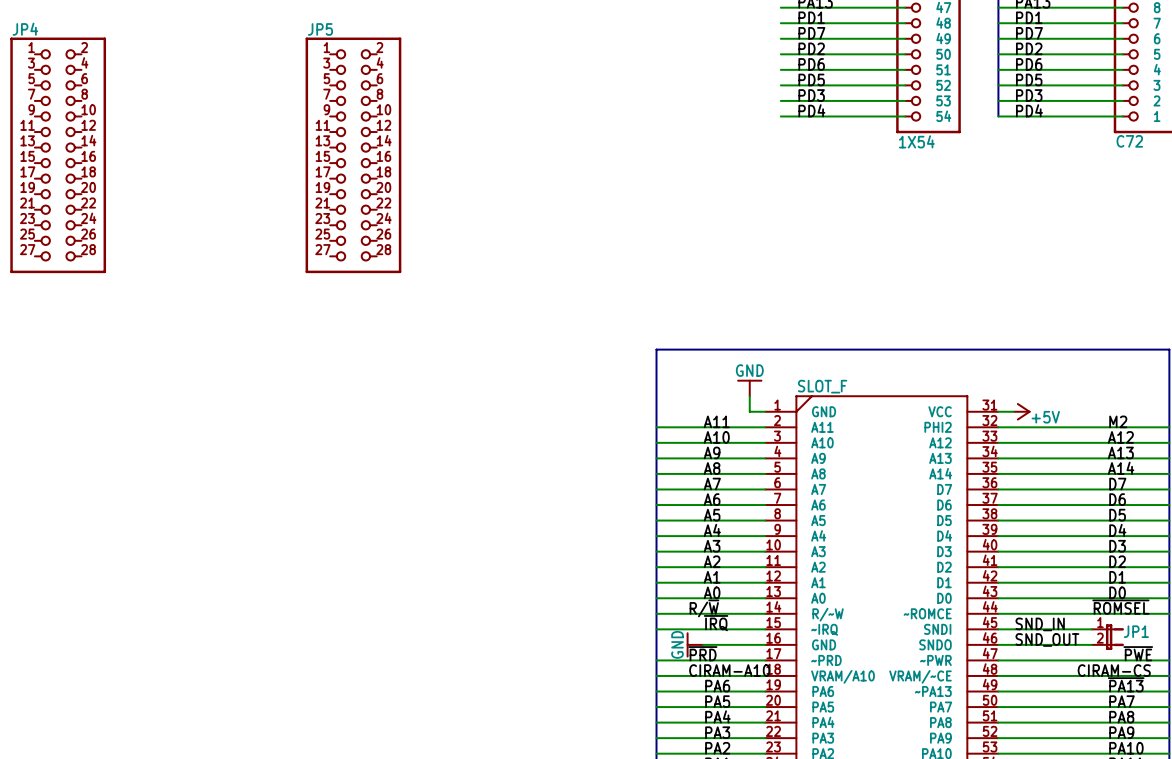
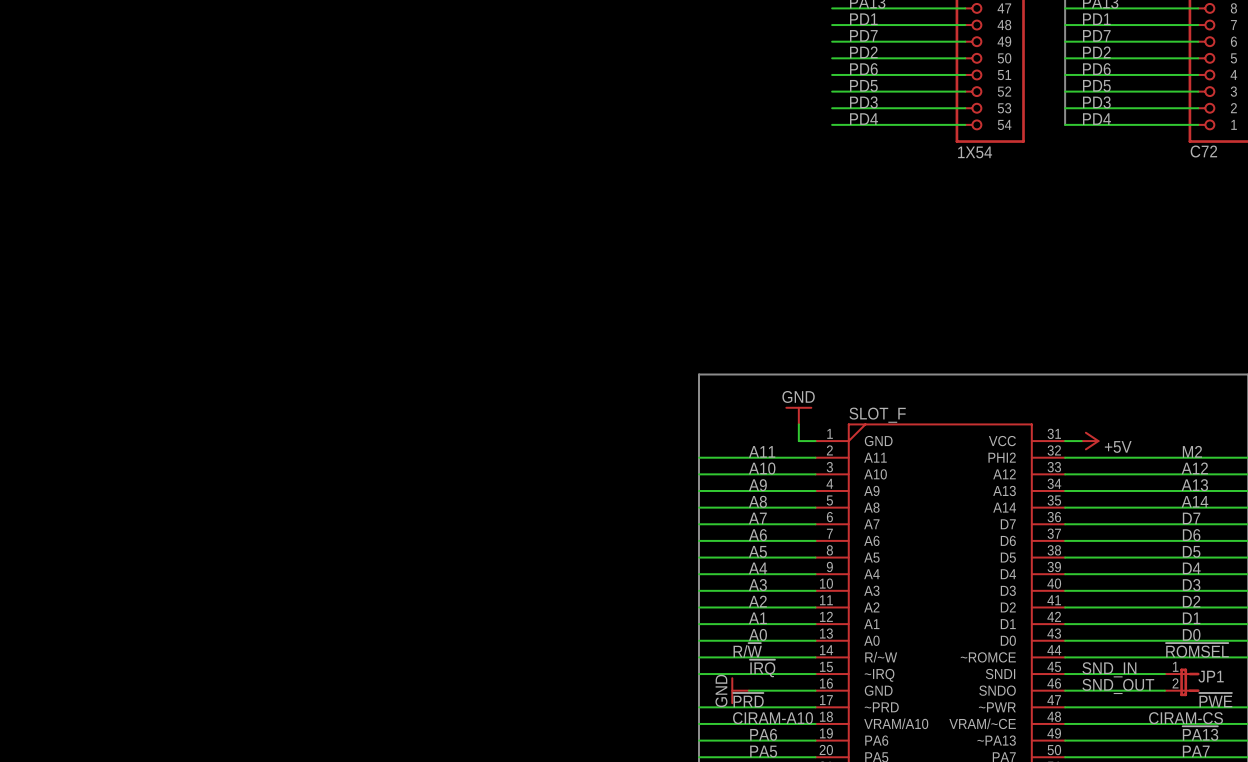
JP4: (58, 155) -> none
JP5: (353, 155) -> none

